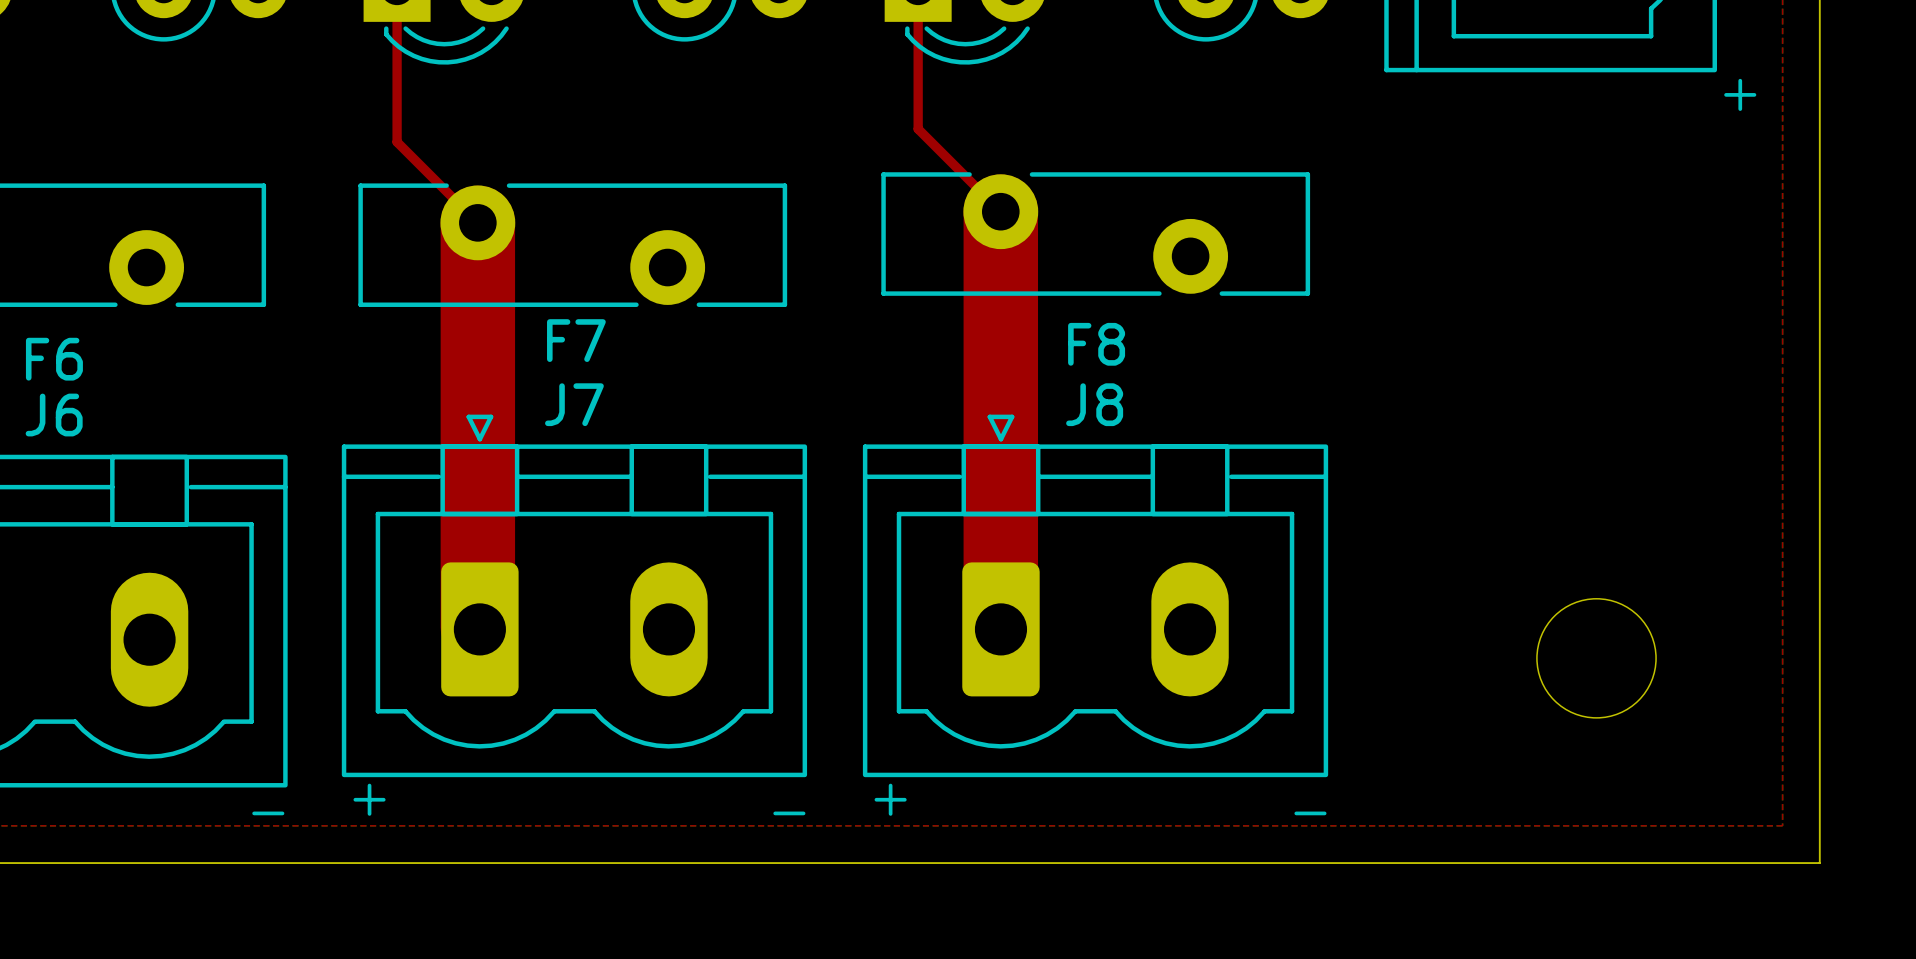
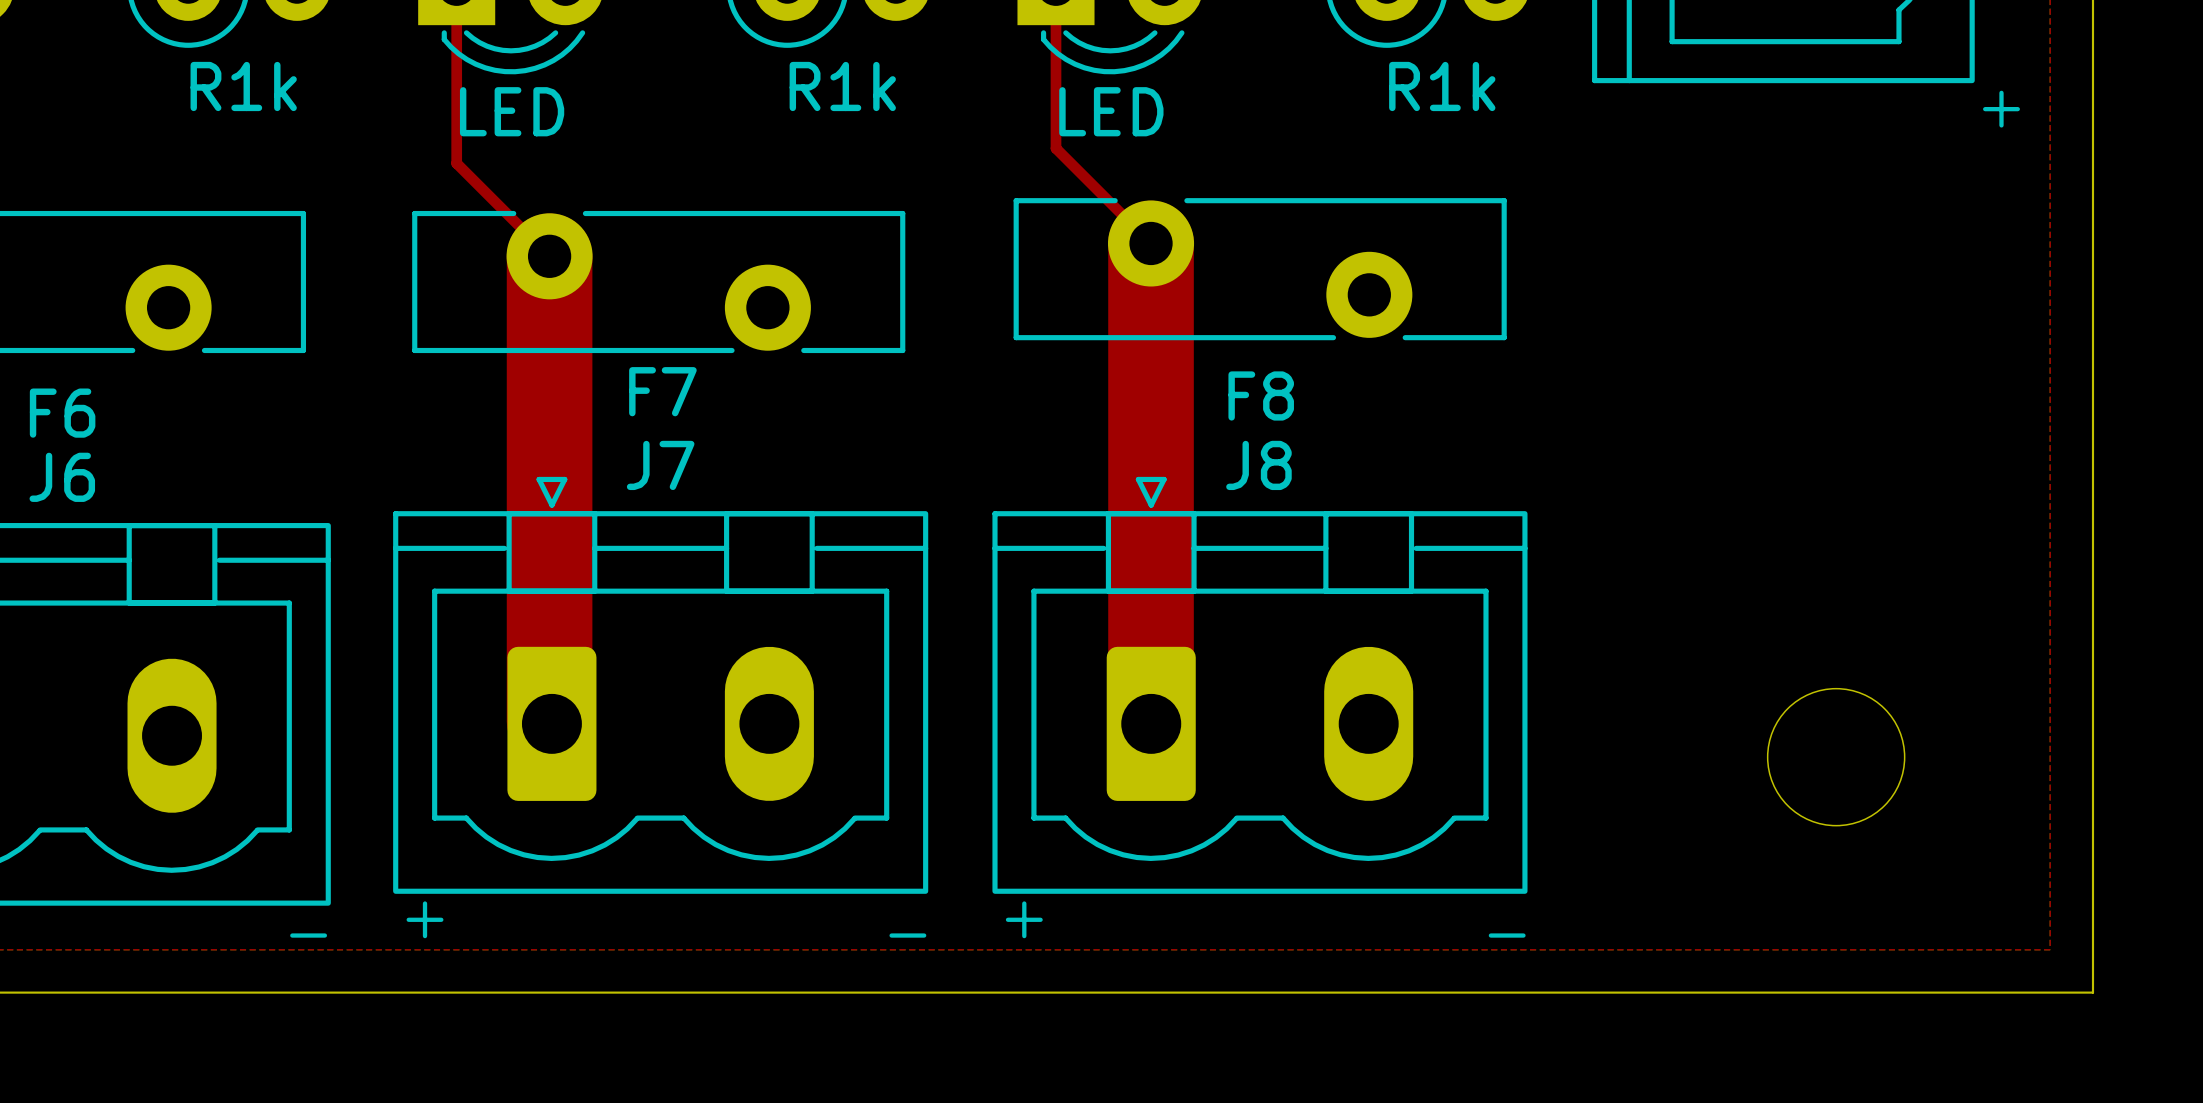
part value: none -> R1k (243, 86)
part value: none -> R1k (842, 86)
part value: none -> R1k (1442, 86)
part value: none -> LED (512, 111)
part value: none -> LED (1111, 111)

